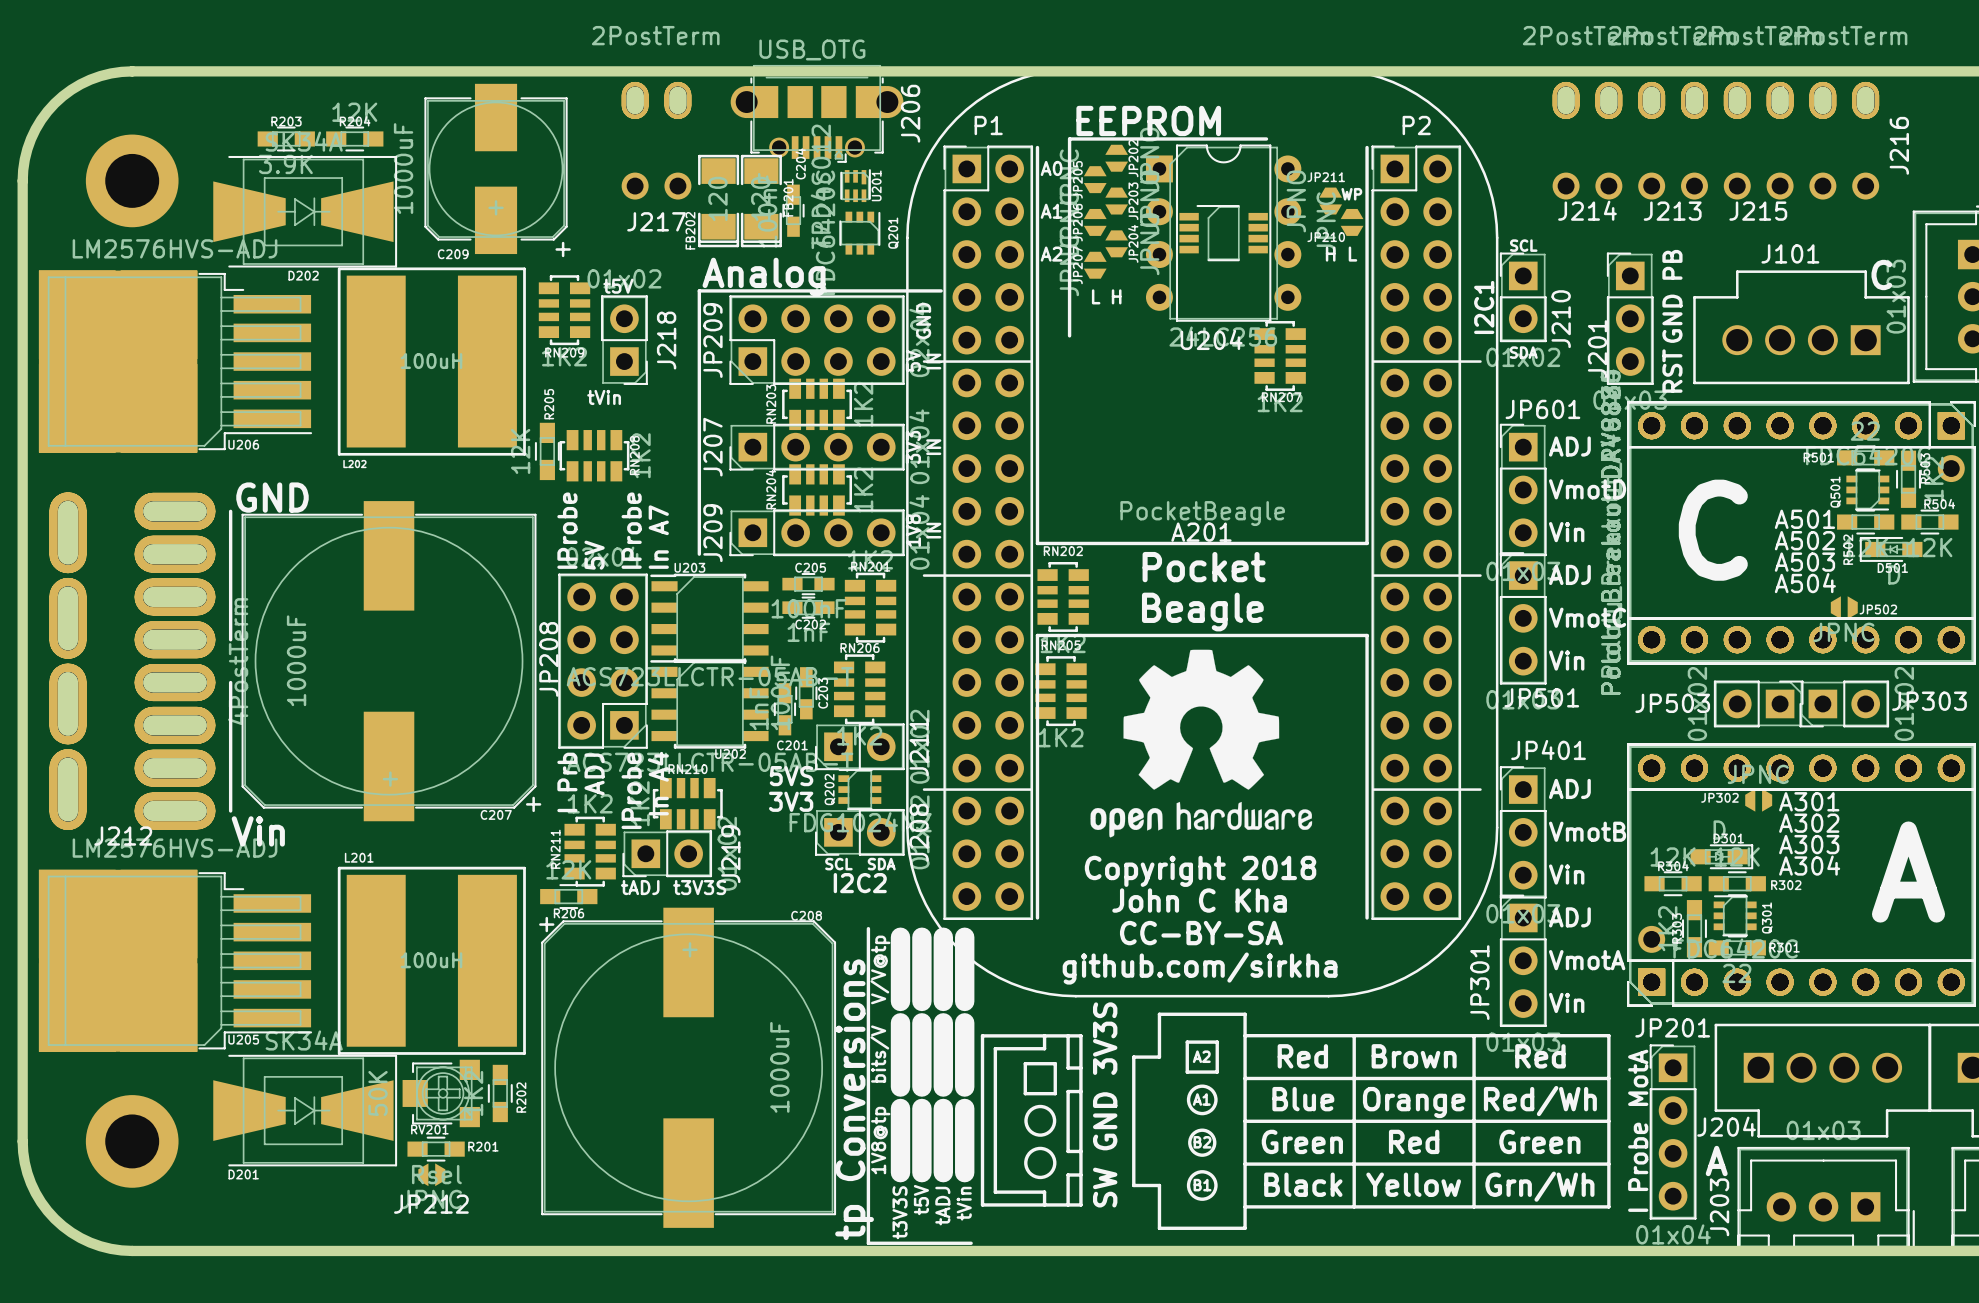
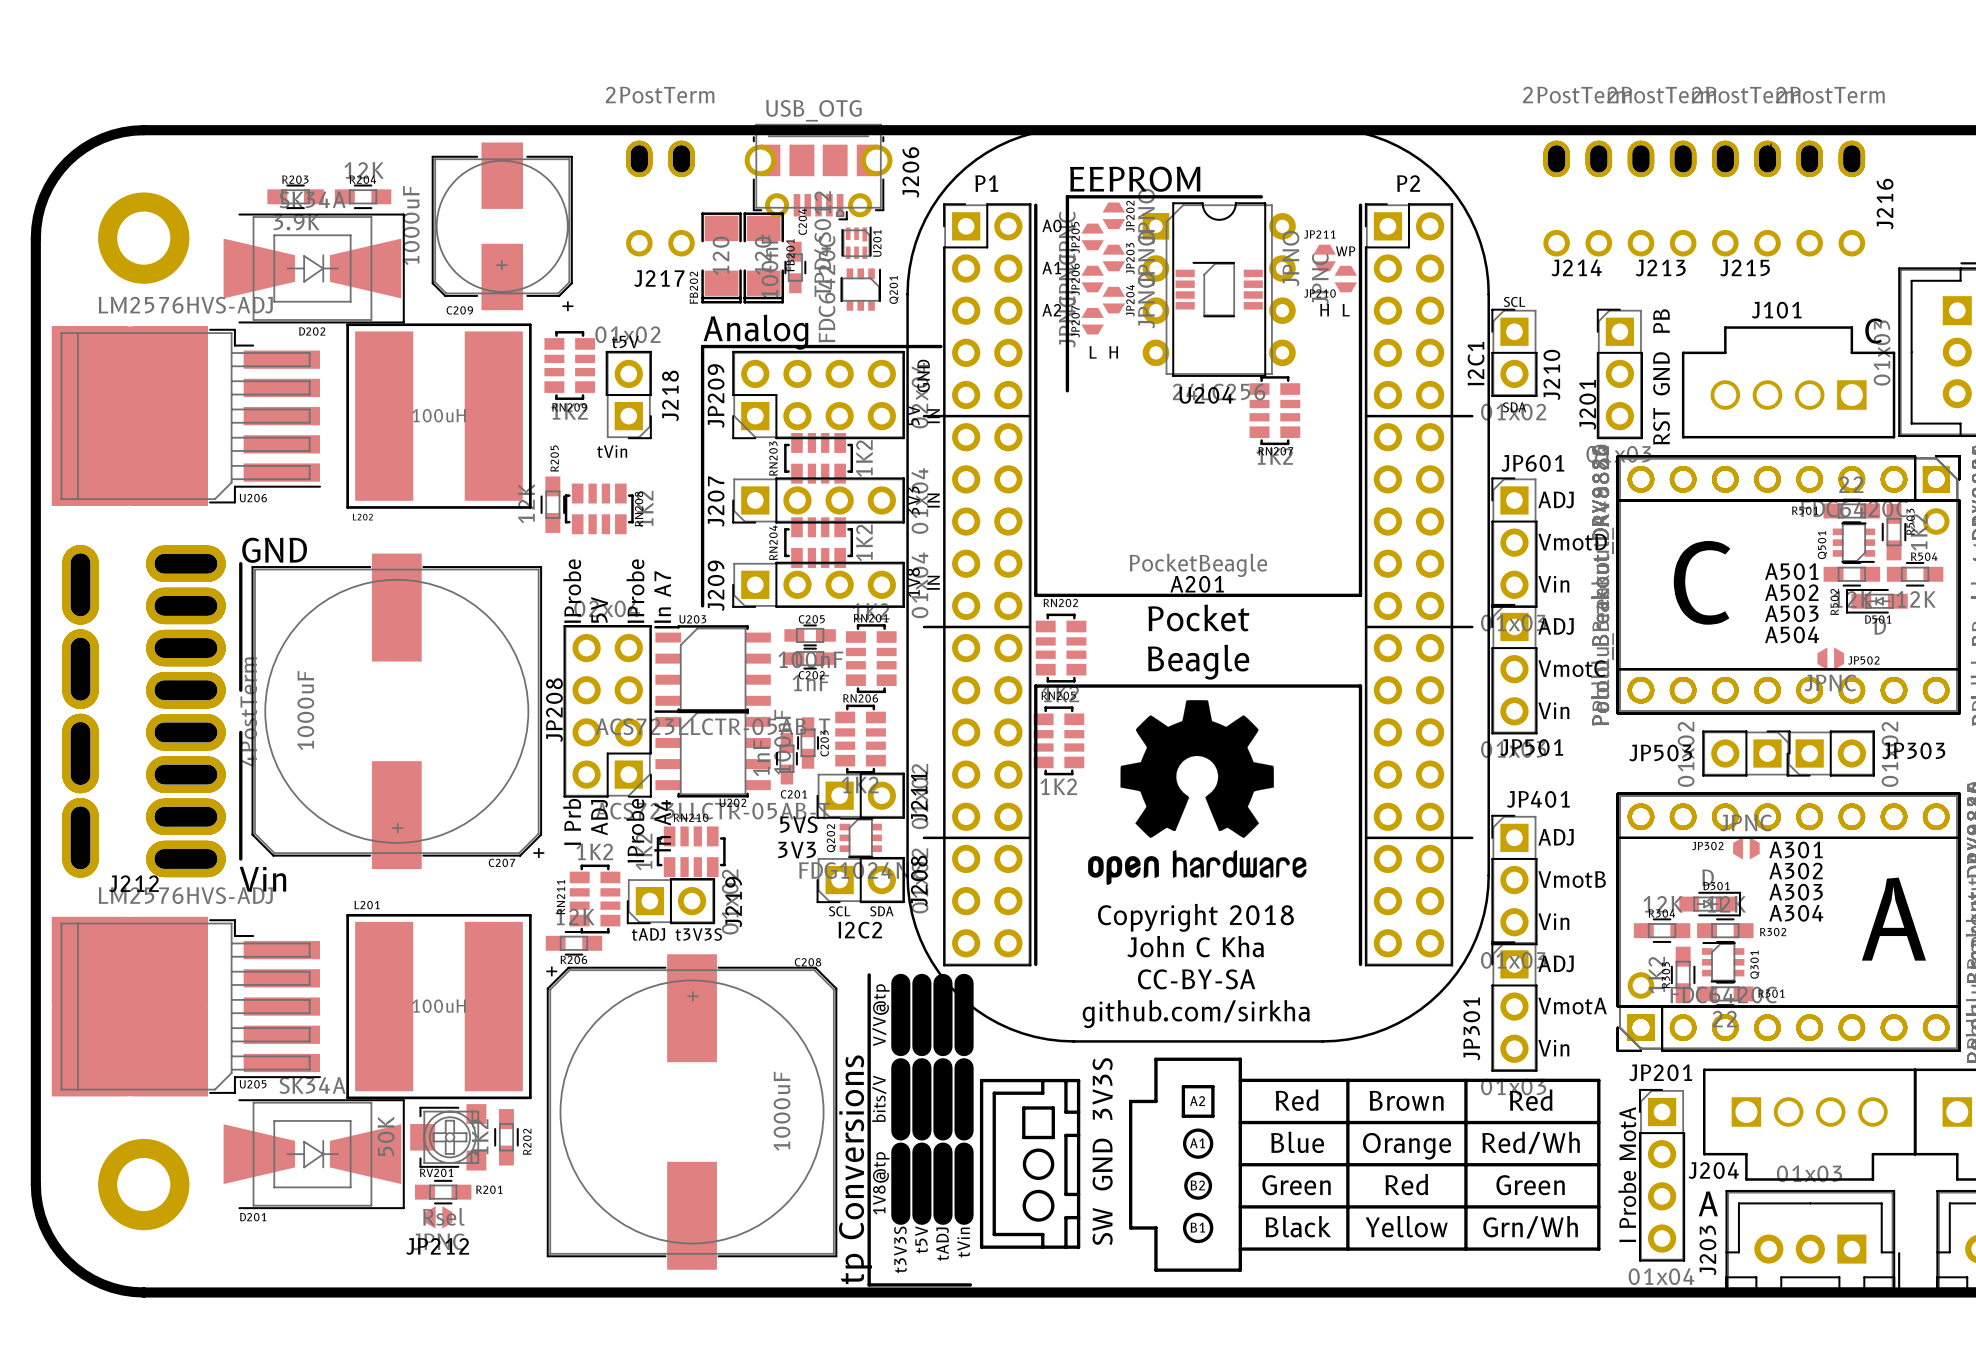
J206 footprint: [730, 64, 904, 163] -> [744, 123, 893, 221]

